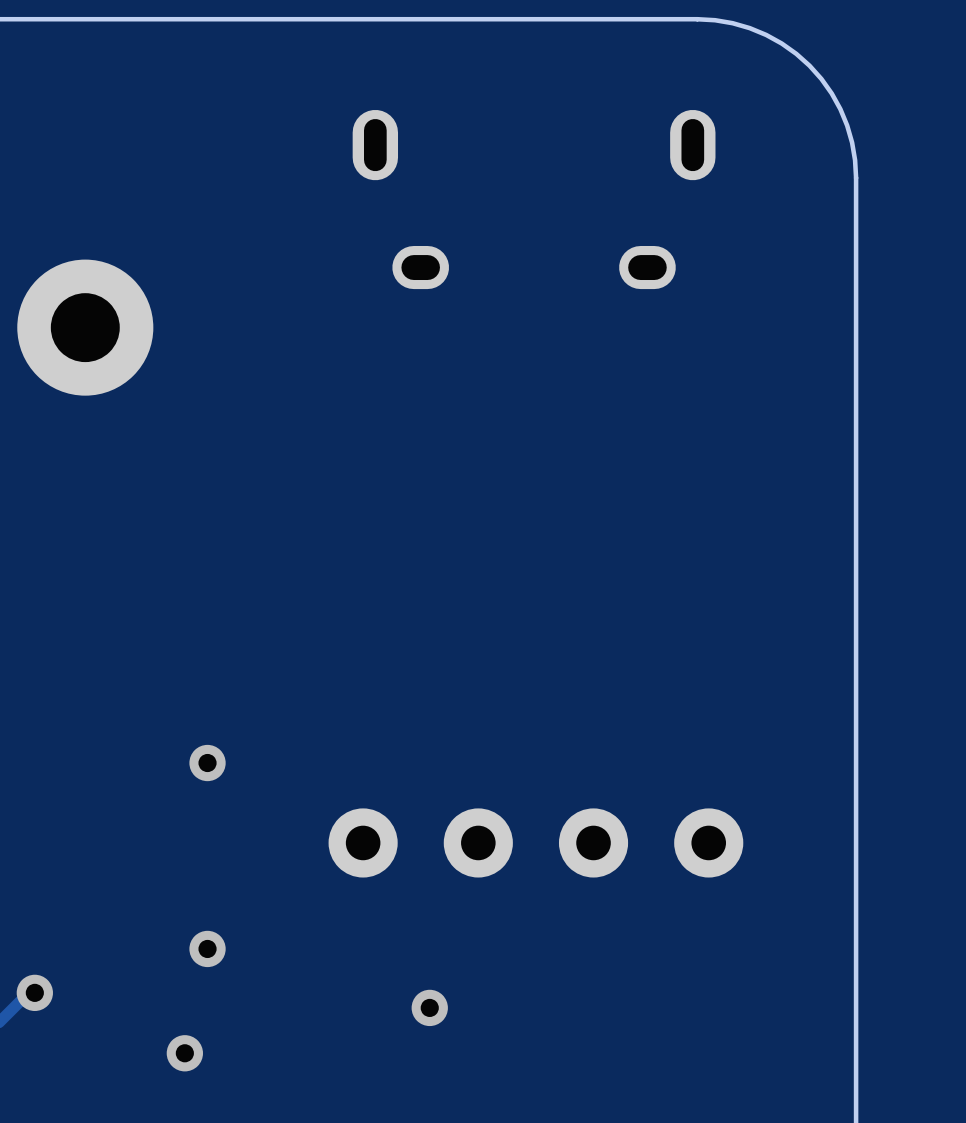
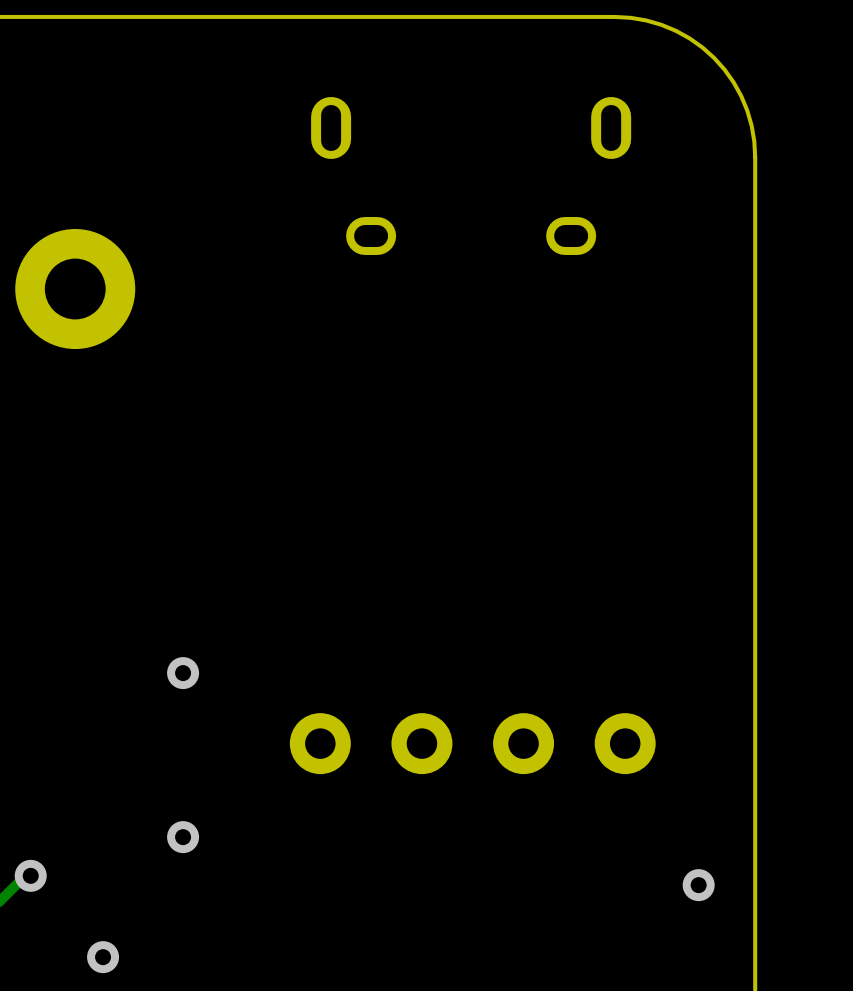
via: none -> (698, 885)
via: (429, 1007) -> none
via position: (184, 1053) -> (103, 957)

